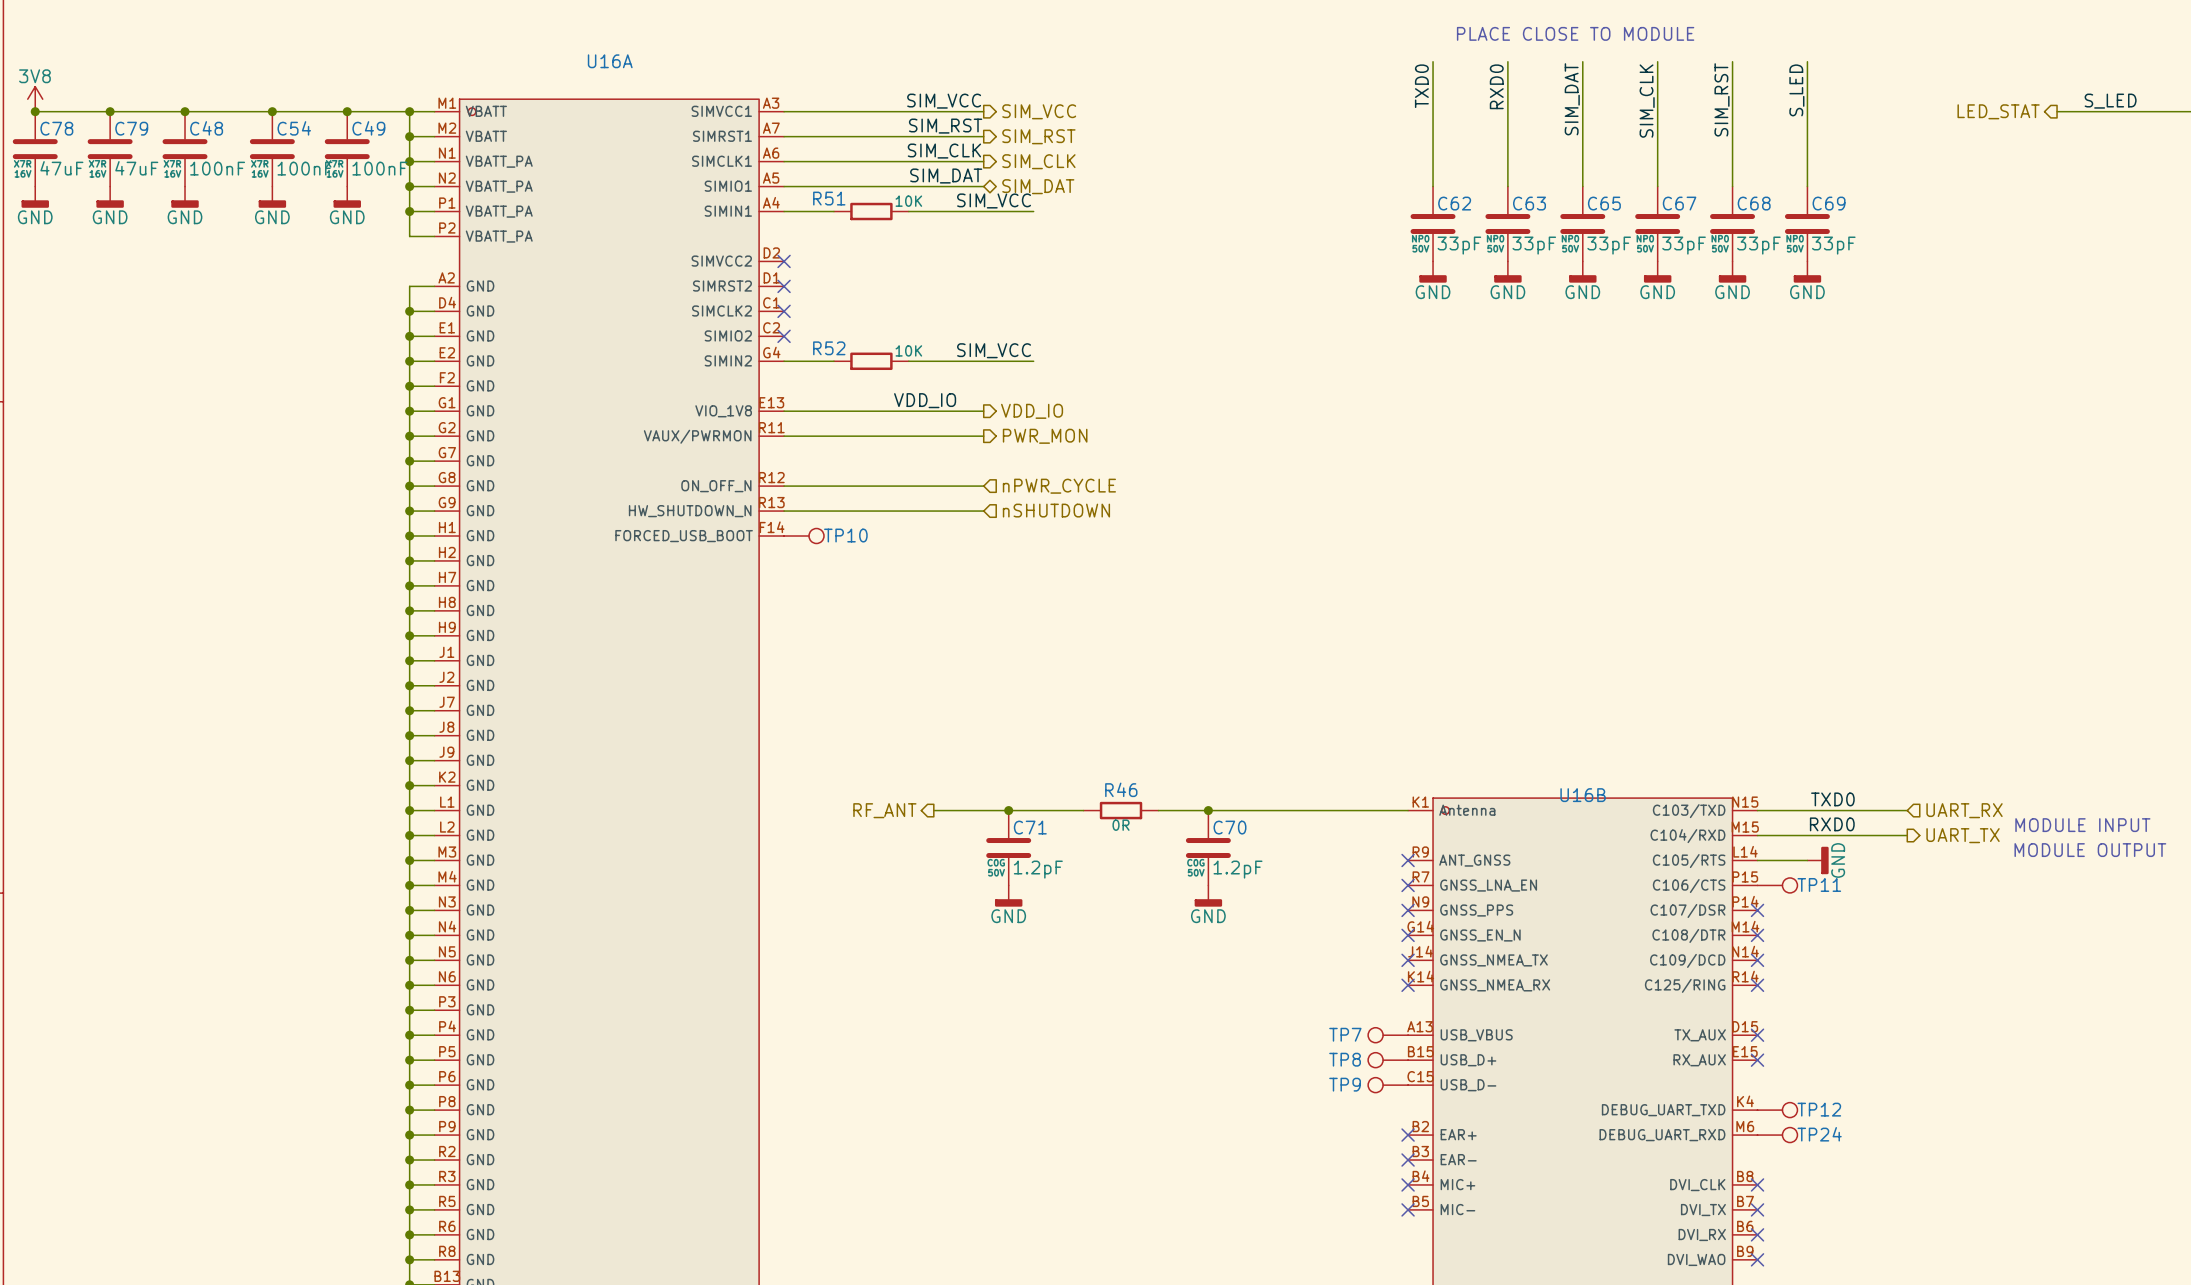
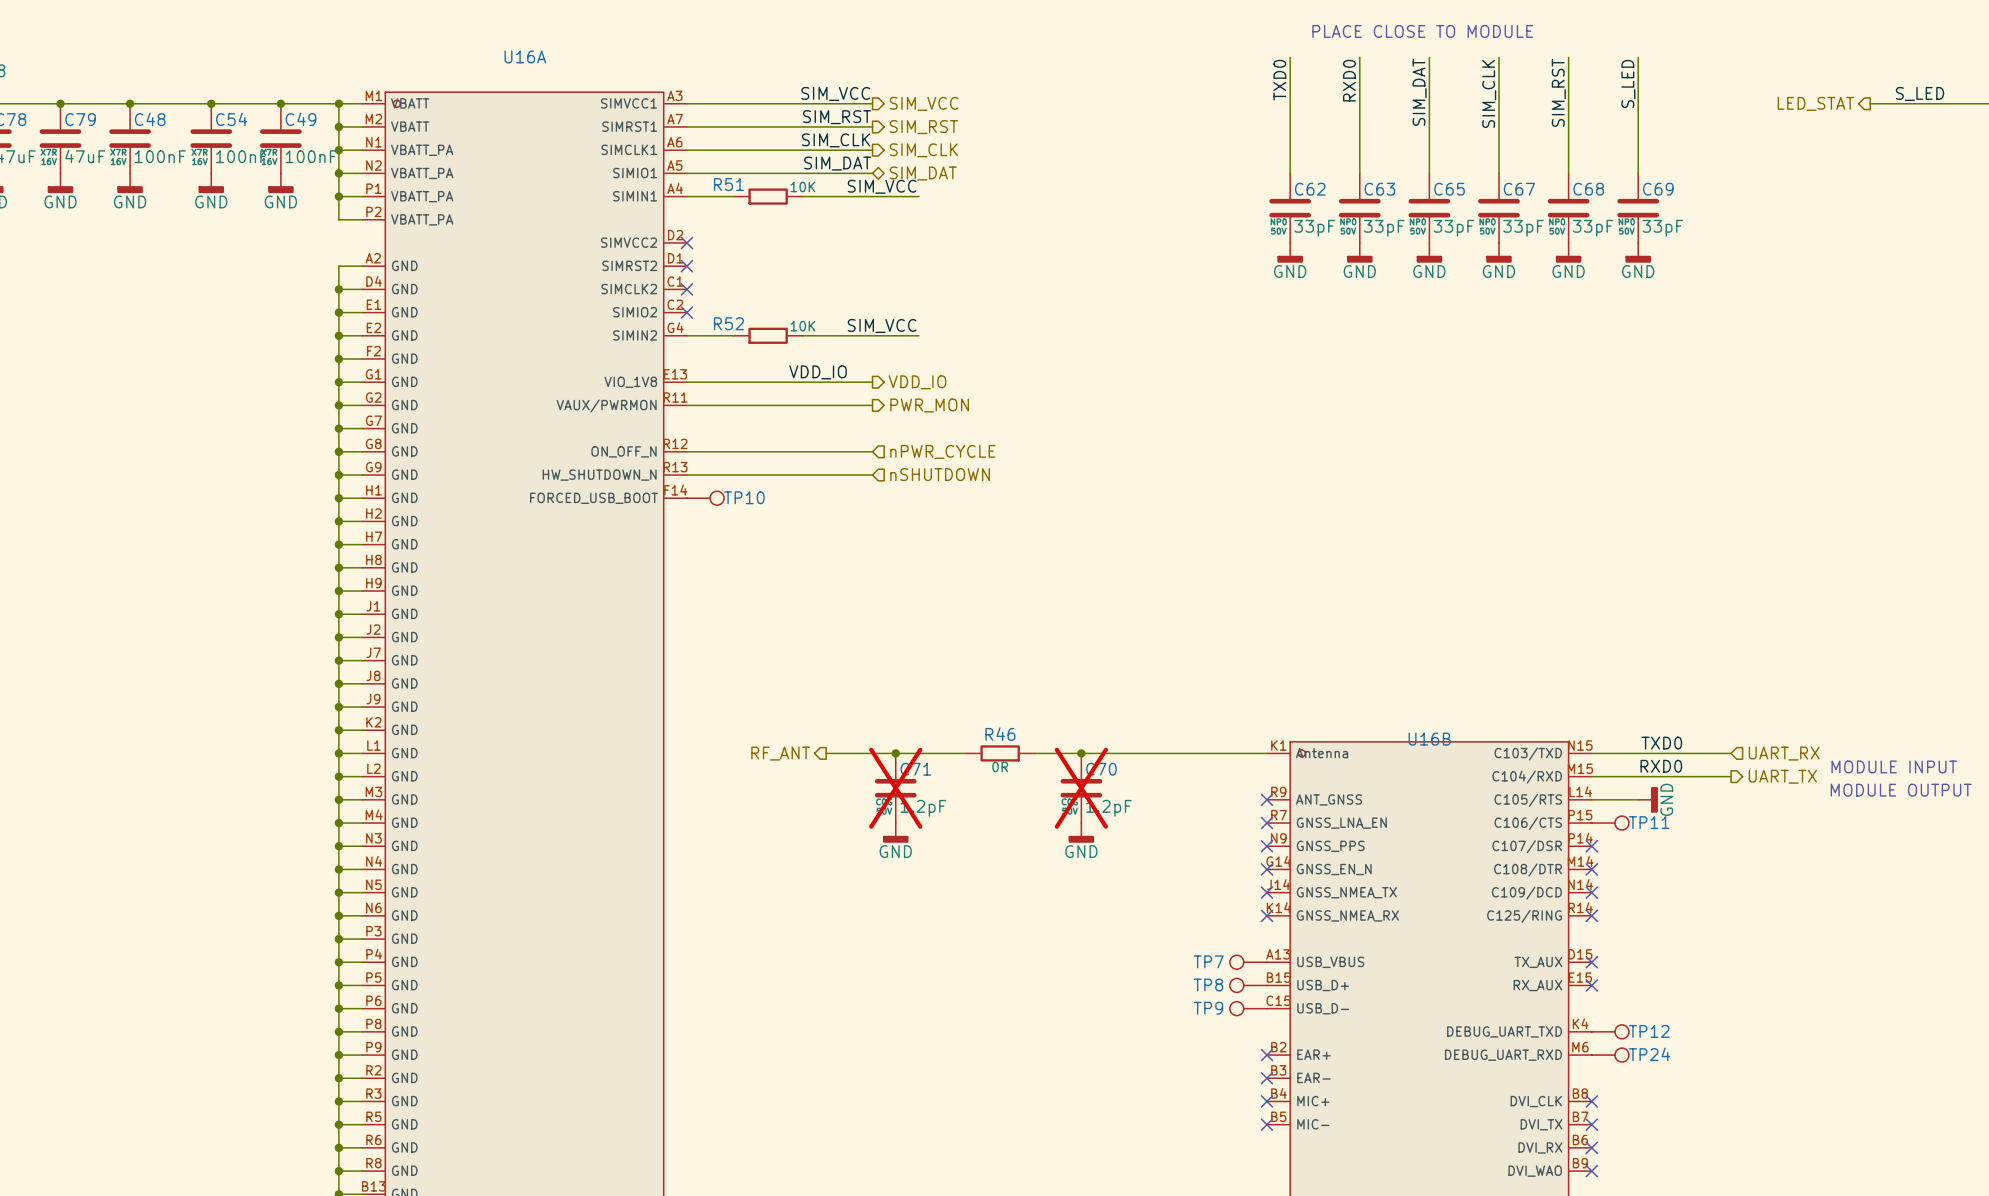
C71 do-not-place cross: none -> (895, 788)
C70 do-not-place cross: none -> (1081, 788)

